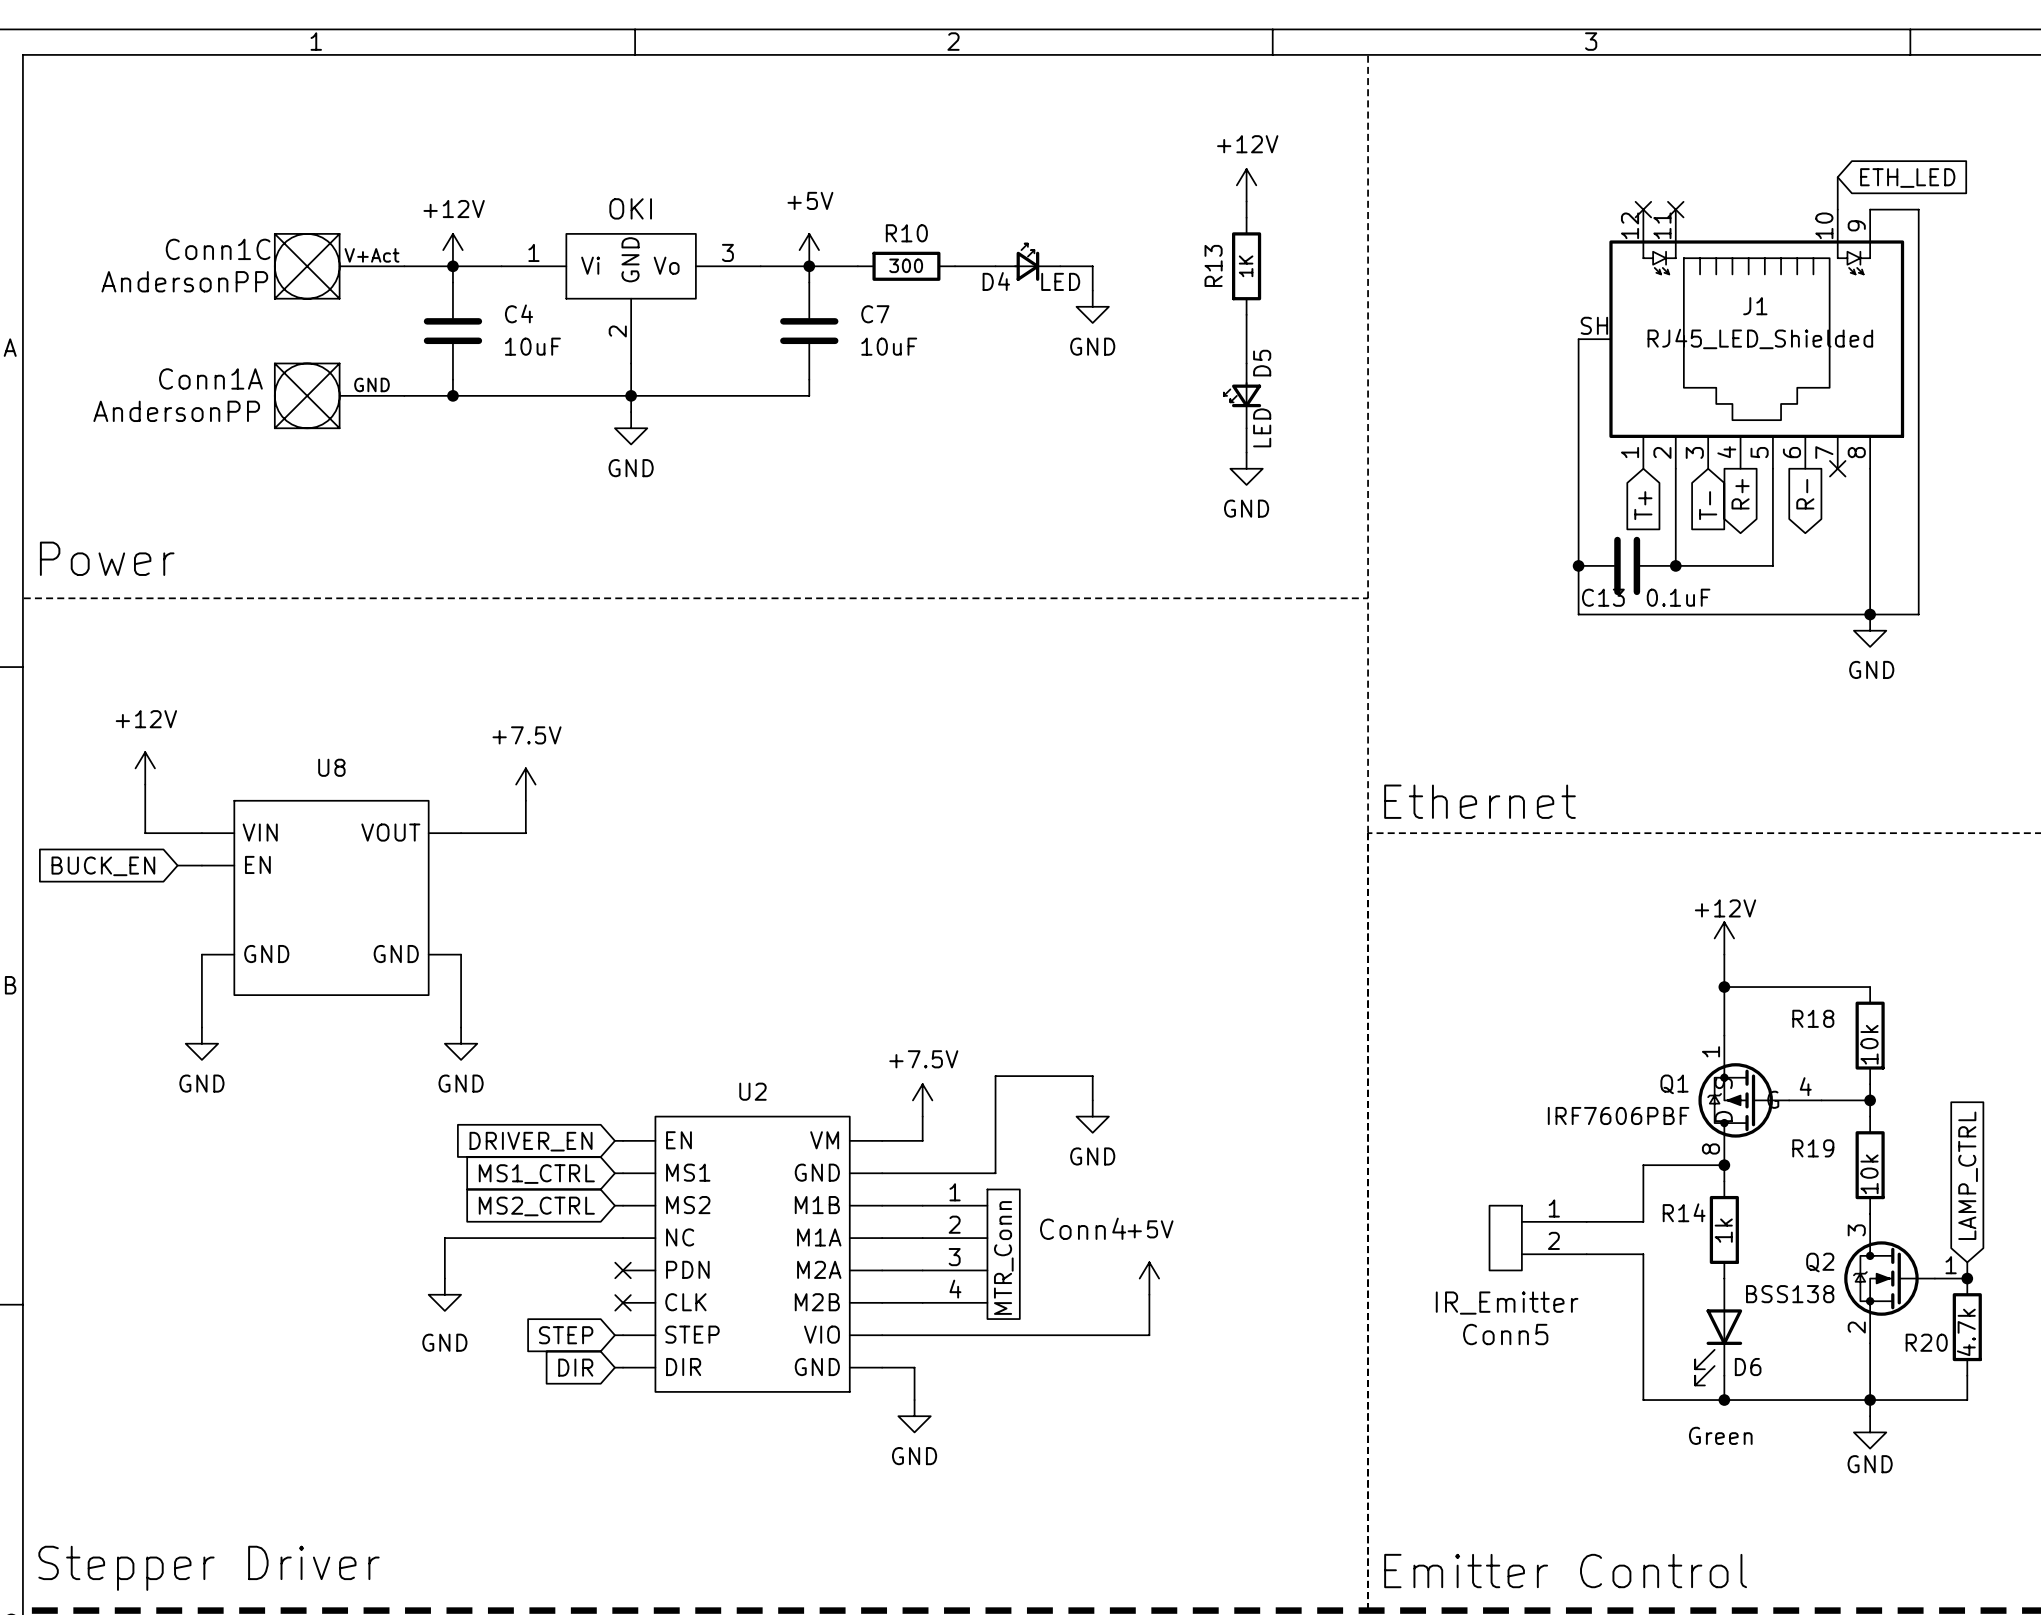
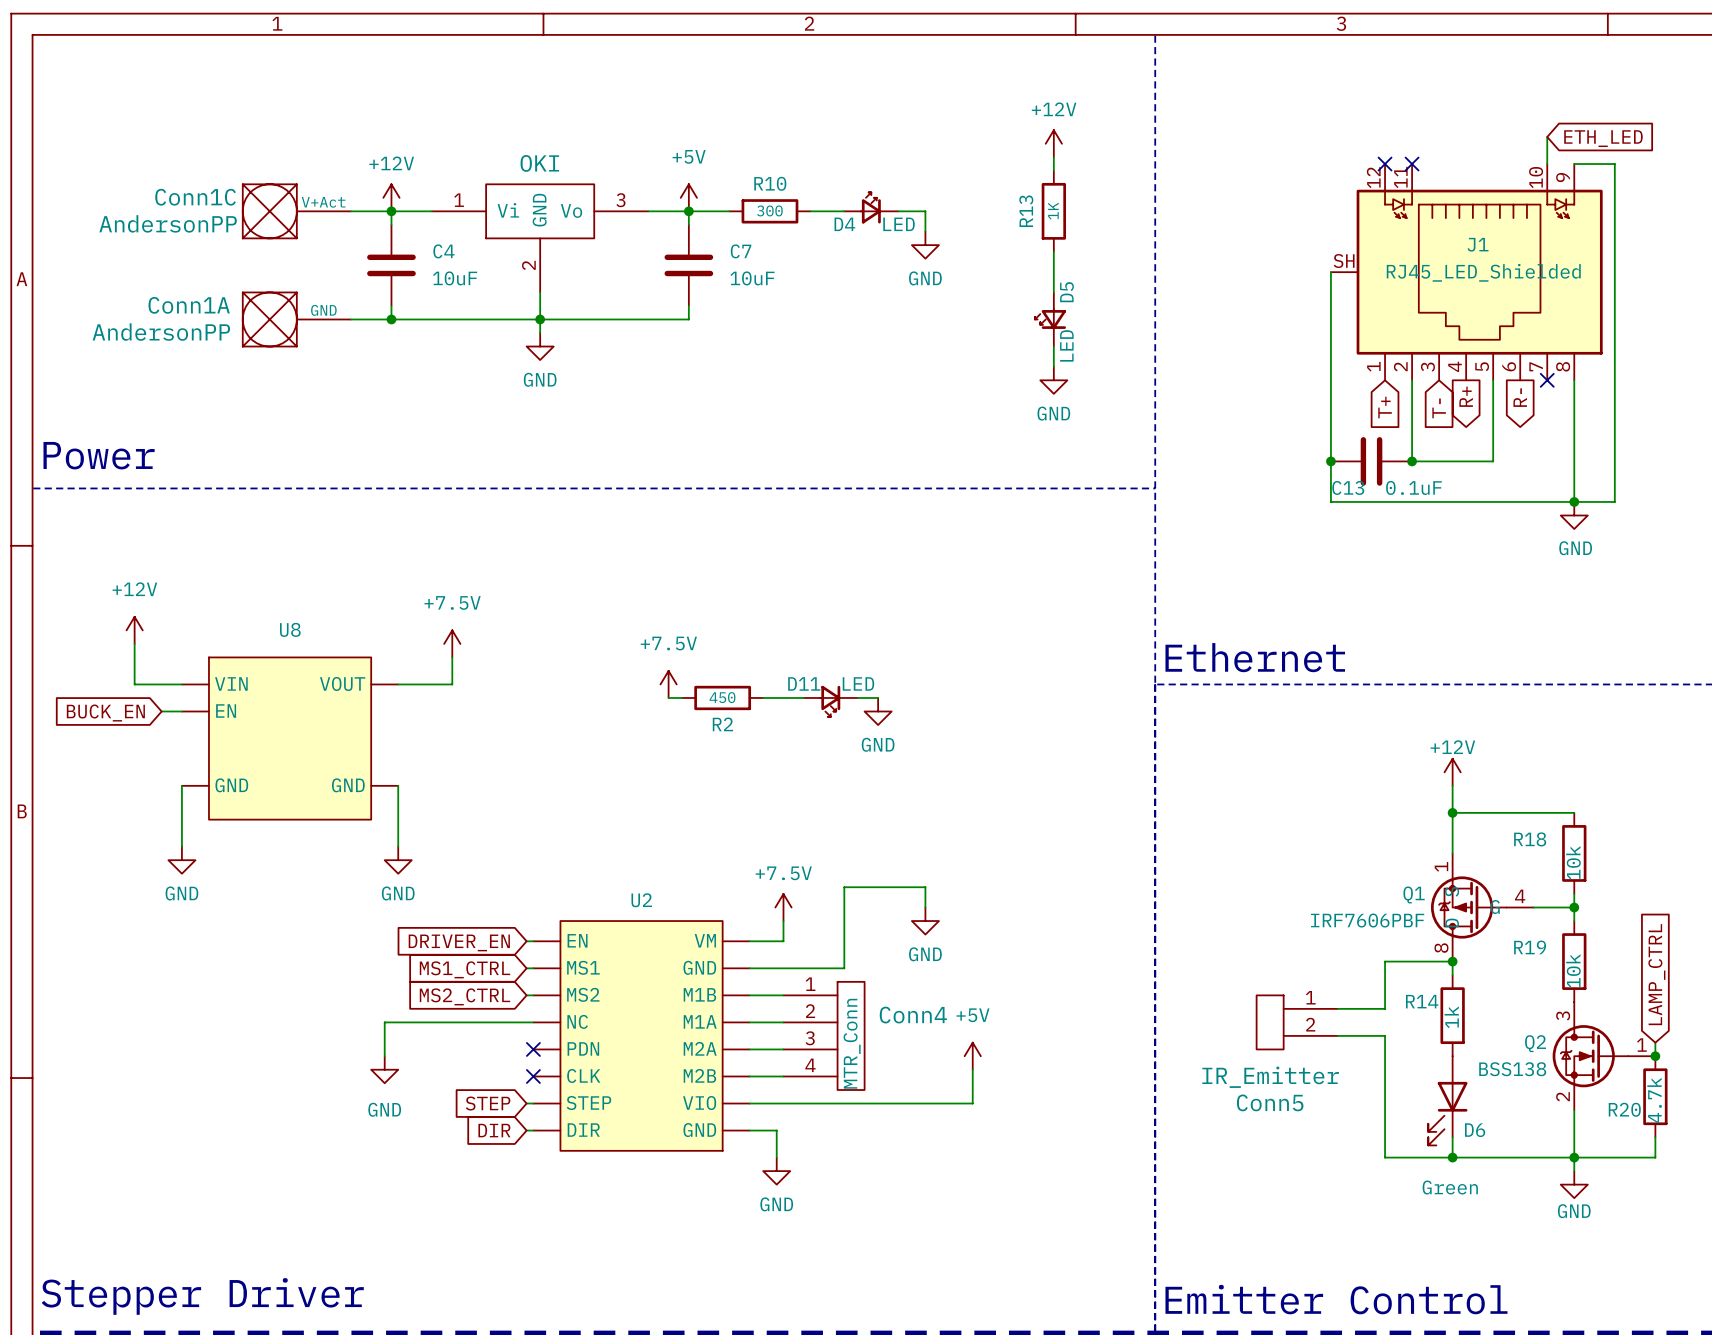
power symbol: none -> +7.5V (668, 684)
wire: none -> (668, 697) (682, 697)
R2: none -> 450 (722, 697)
wire: none -> (763, 697) (803, 697)
wire: none -> (857, 697) (878, 697)
D11: none -> LED (830, 701)
power symbol: none -> GND (878, 711)

